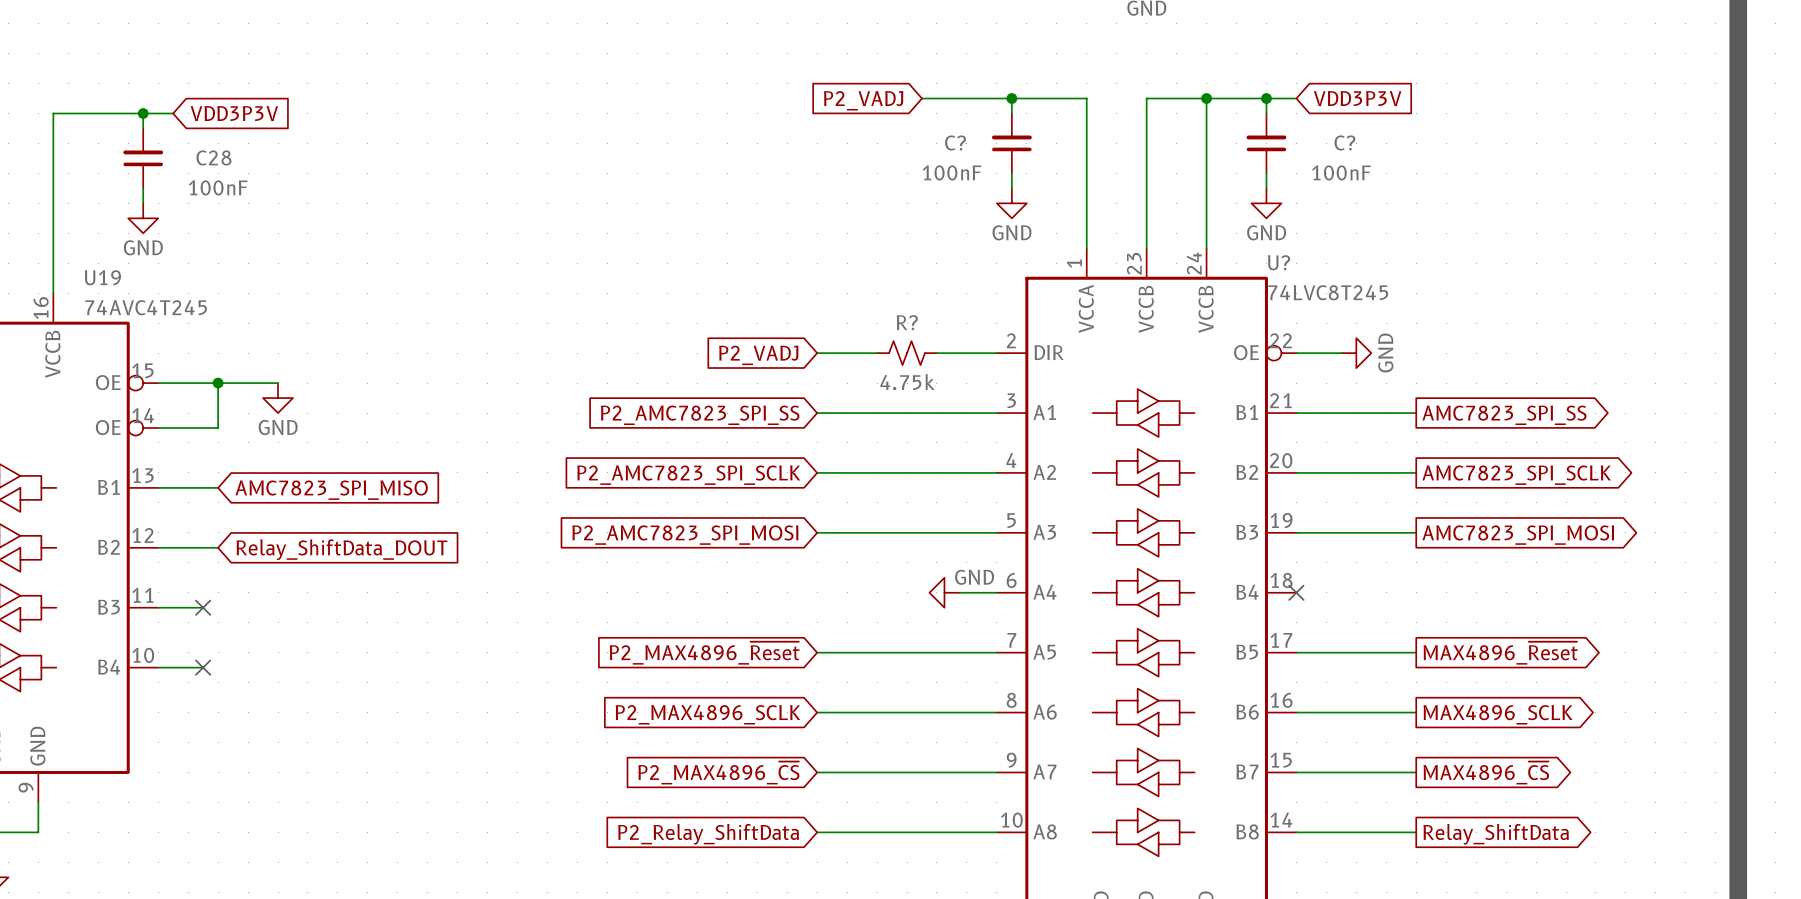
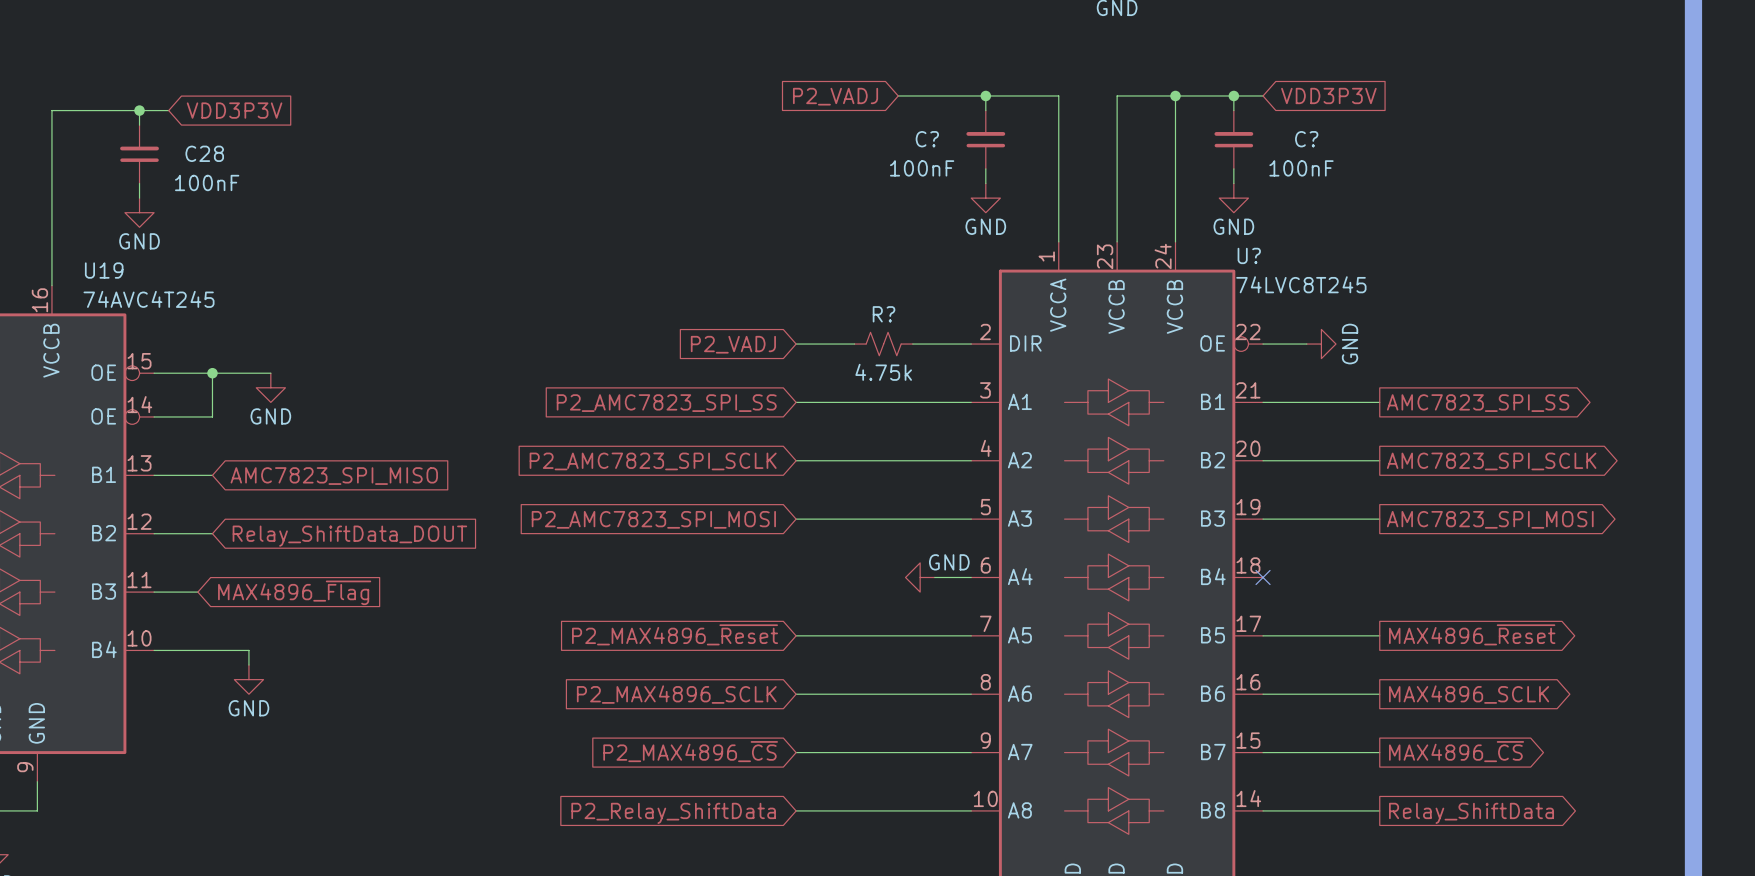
no-connect mark: (203, 607) -> none
global label: none -> MAX4896_~{Flag} (294, 592)
wire: none -> (197, 650) (248, 650) (248, 665)
no-connect mark: (203, 667) -> none
power symbol: none -> GND (248, 679)

